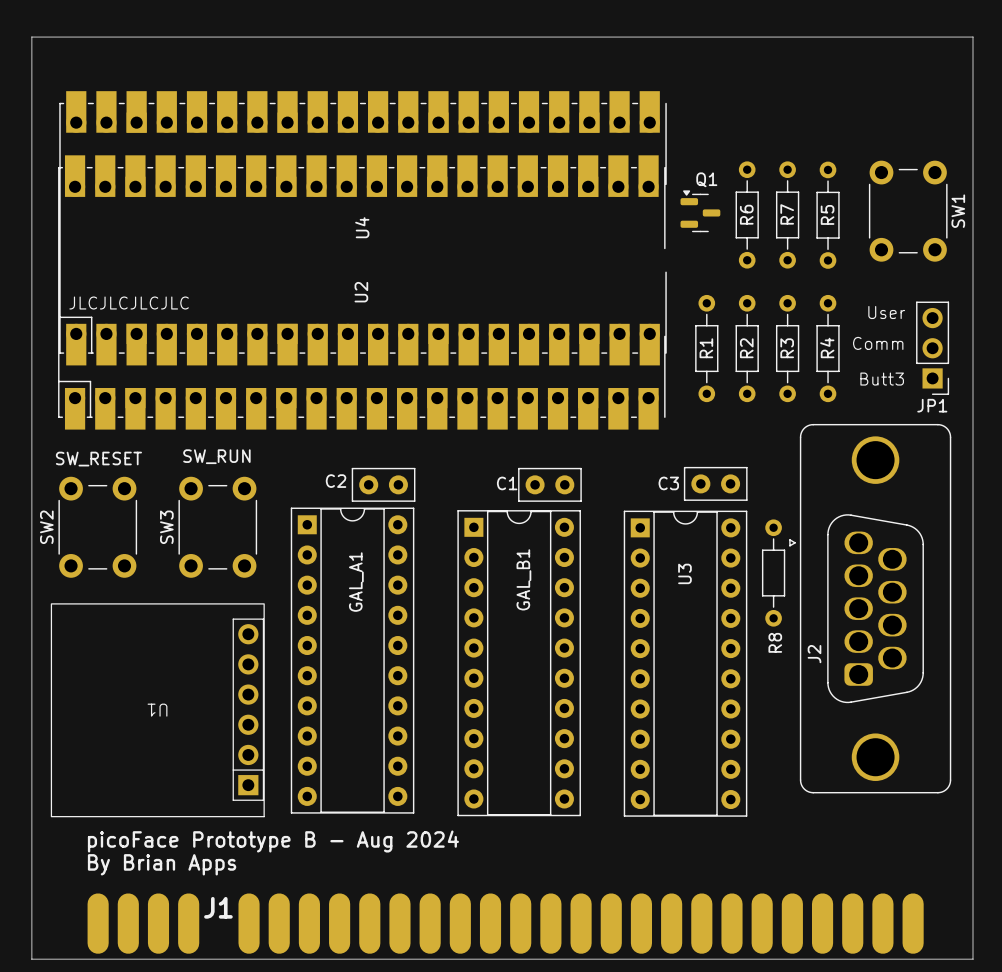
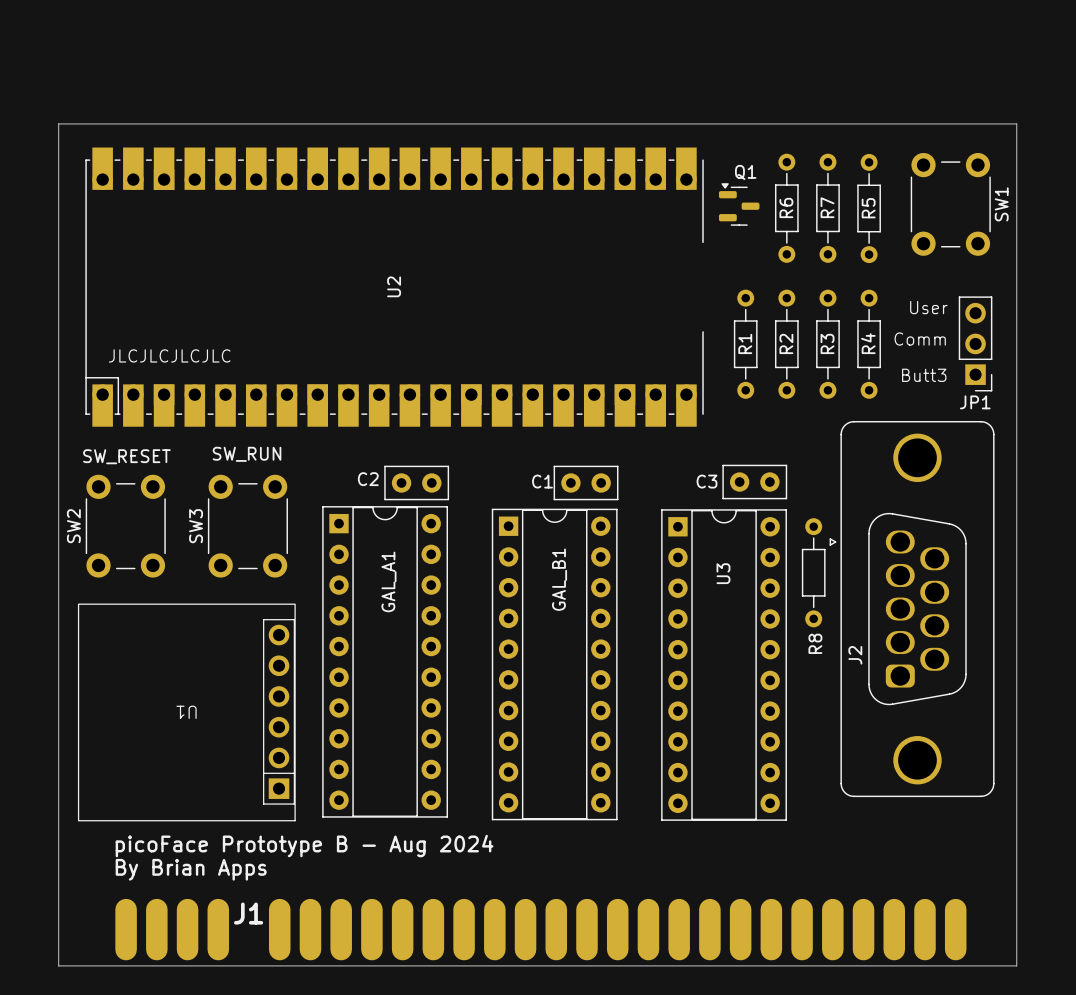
board edge: (31, 132) (31, 37) (972, 37) (972, 132) -> (58, 123) (1016, 123)
U4: (363, 228) -> none
text position: JLCJLCJLCJLC (129, 303) -> JLCJLCJLCJLC (169, 355)

